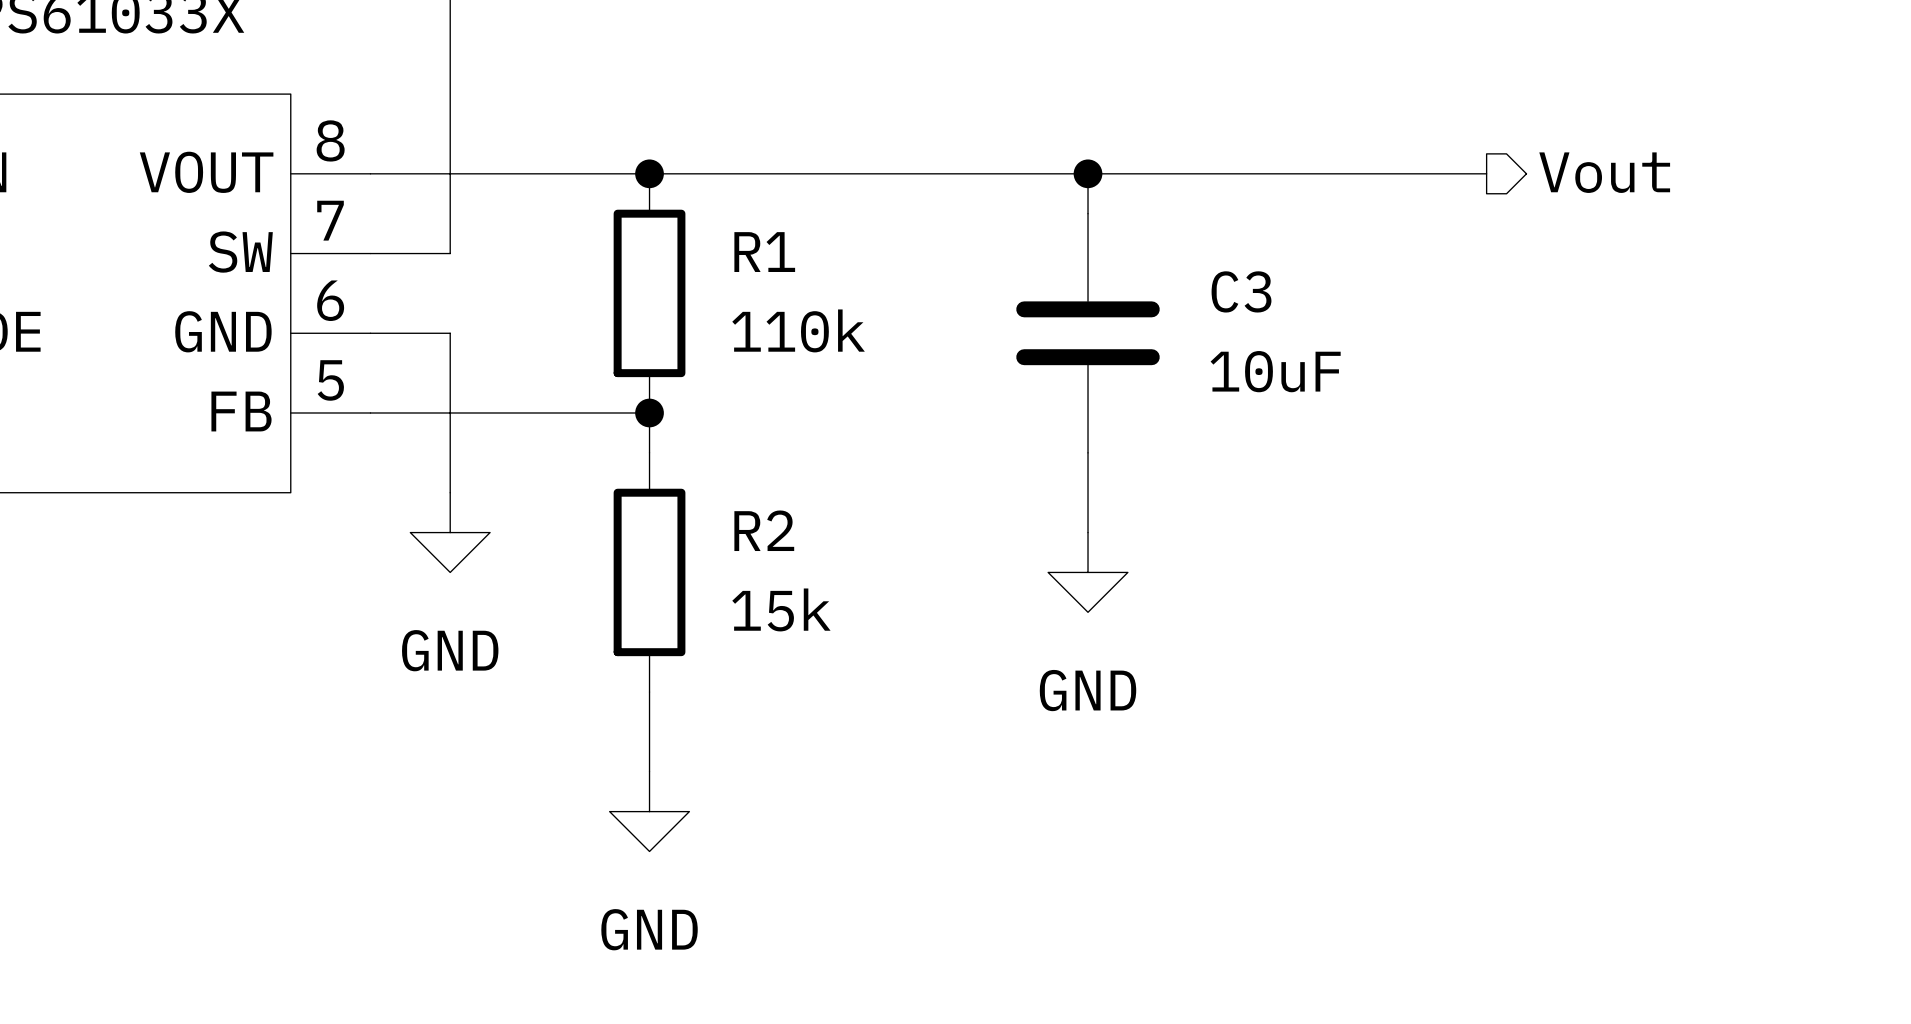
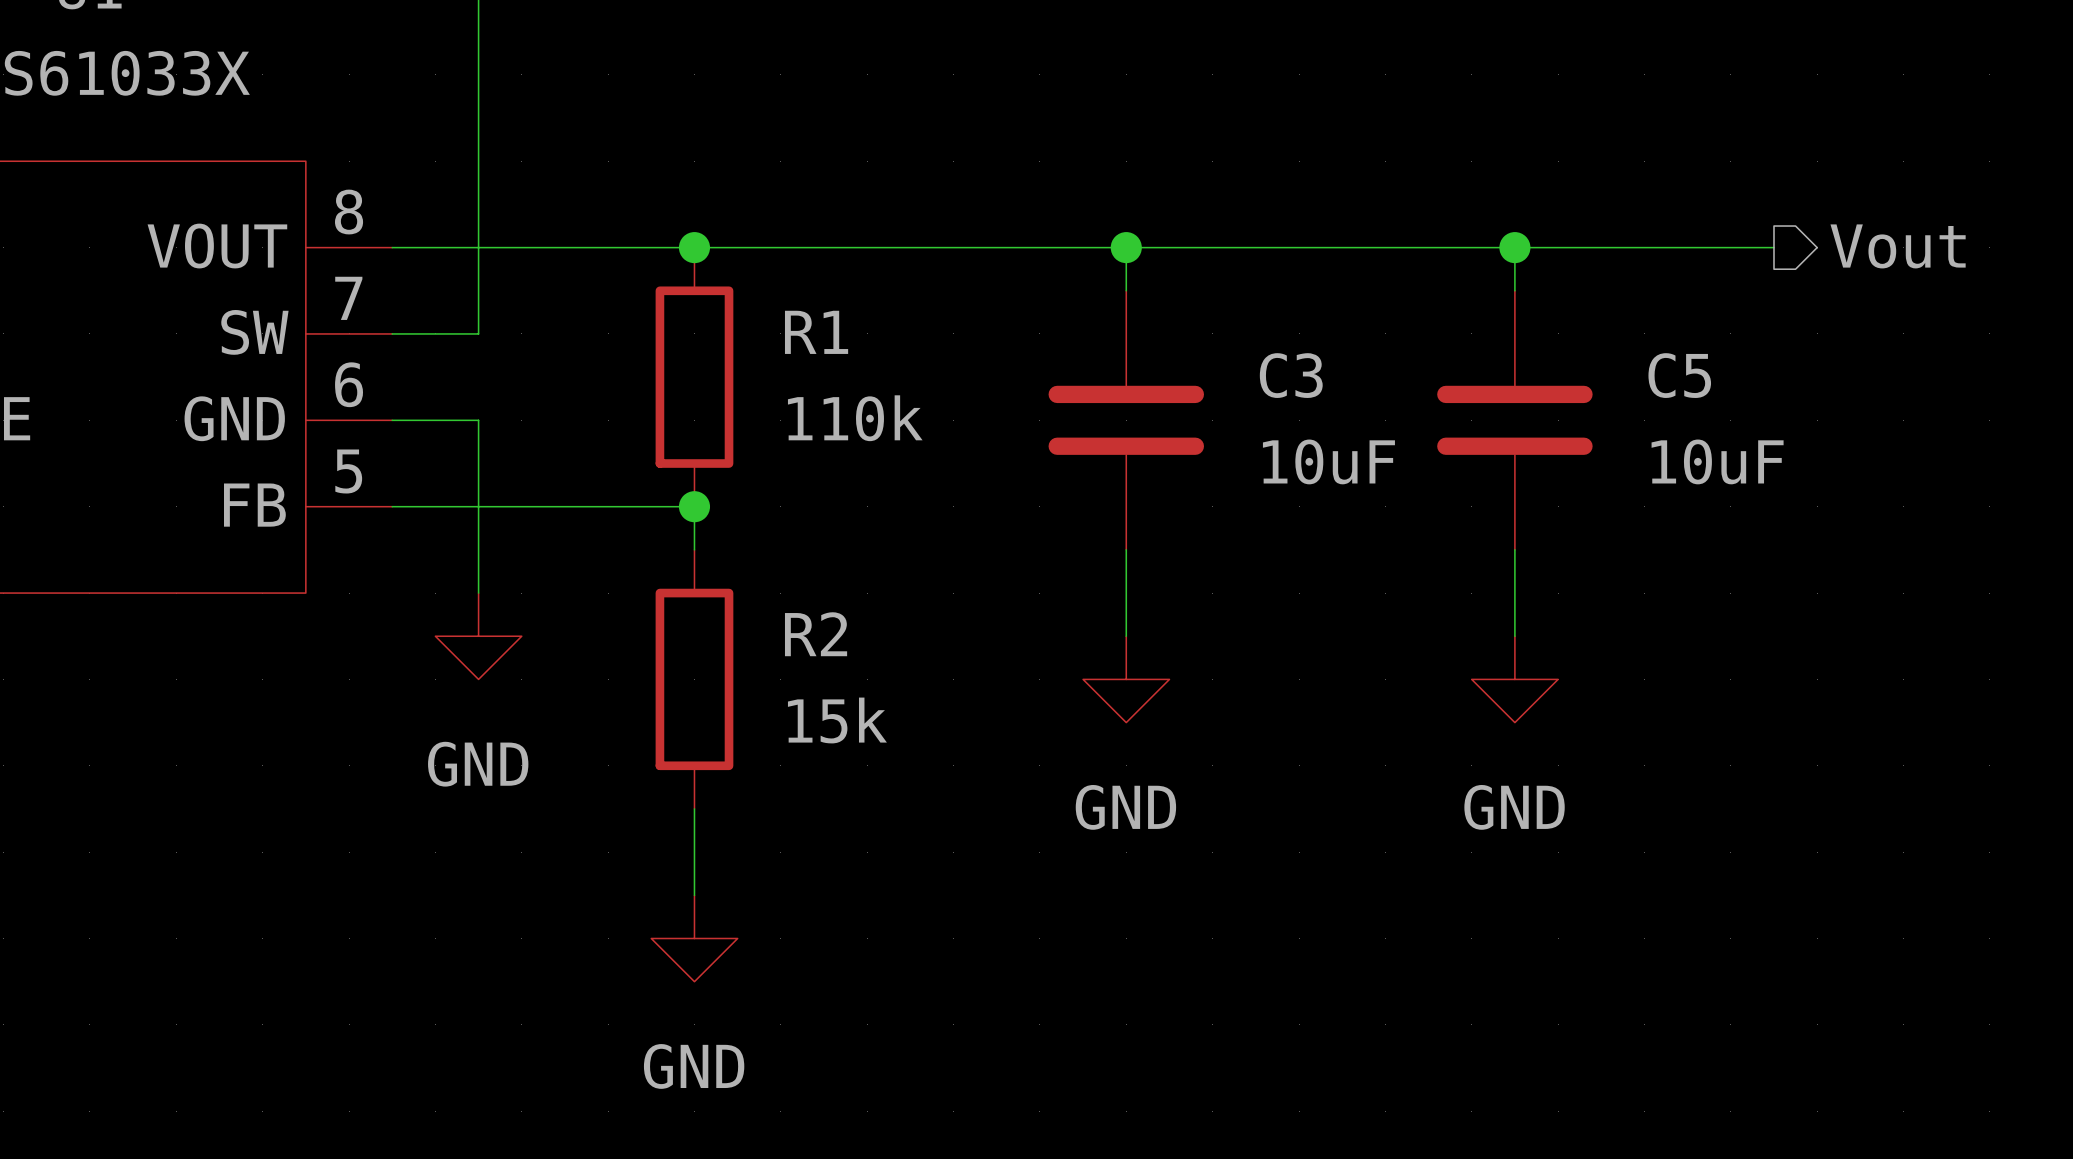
hierarchical label position: Vout (1604, 172) -> Vout (1898, 246)
wire: (1088, 173) (1088, 213) -> (1126, 247) (1126, 290)
junction position: (1088, 173) -> (1126, 247)
wire: none -> (1514, 247) (1514, 290)
junction: none -> (1514, 247)
wire: none -> (1601, 247) (1773, 247)
C3 position: (1088, 333) -> (1126, 420)
C5: none -> 10uF (1514, 420)
wire: (1088, 452) (1088, 532) -> (1126, 549) (1126, 636)
wire: none -> (1514, 549) (1514, 636)
power symbol position: GND (1088, 572) -> GND (1126, 679)
power symbol: none -> GND (1514, 679)

